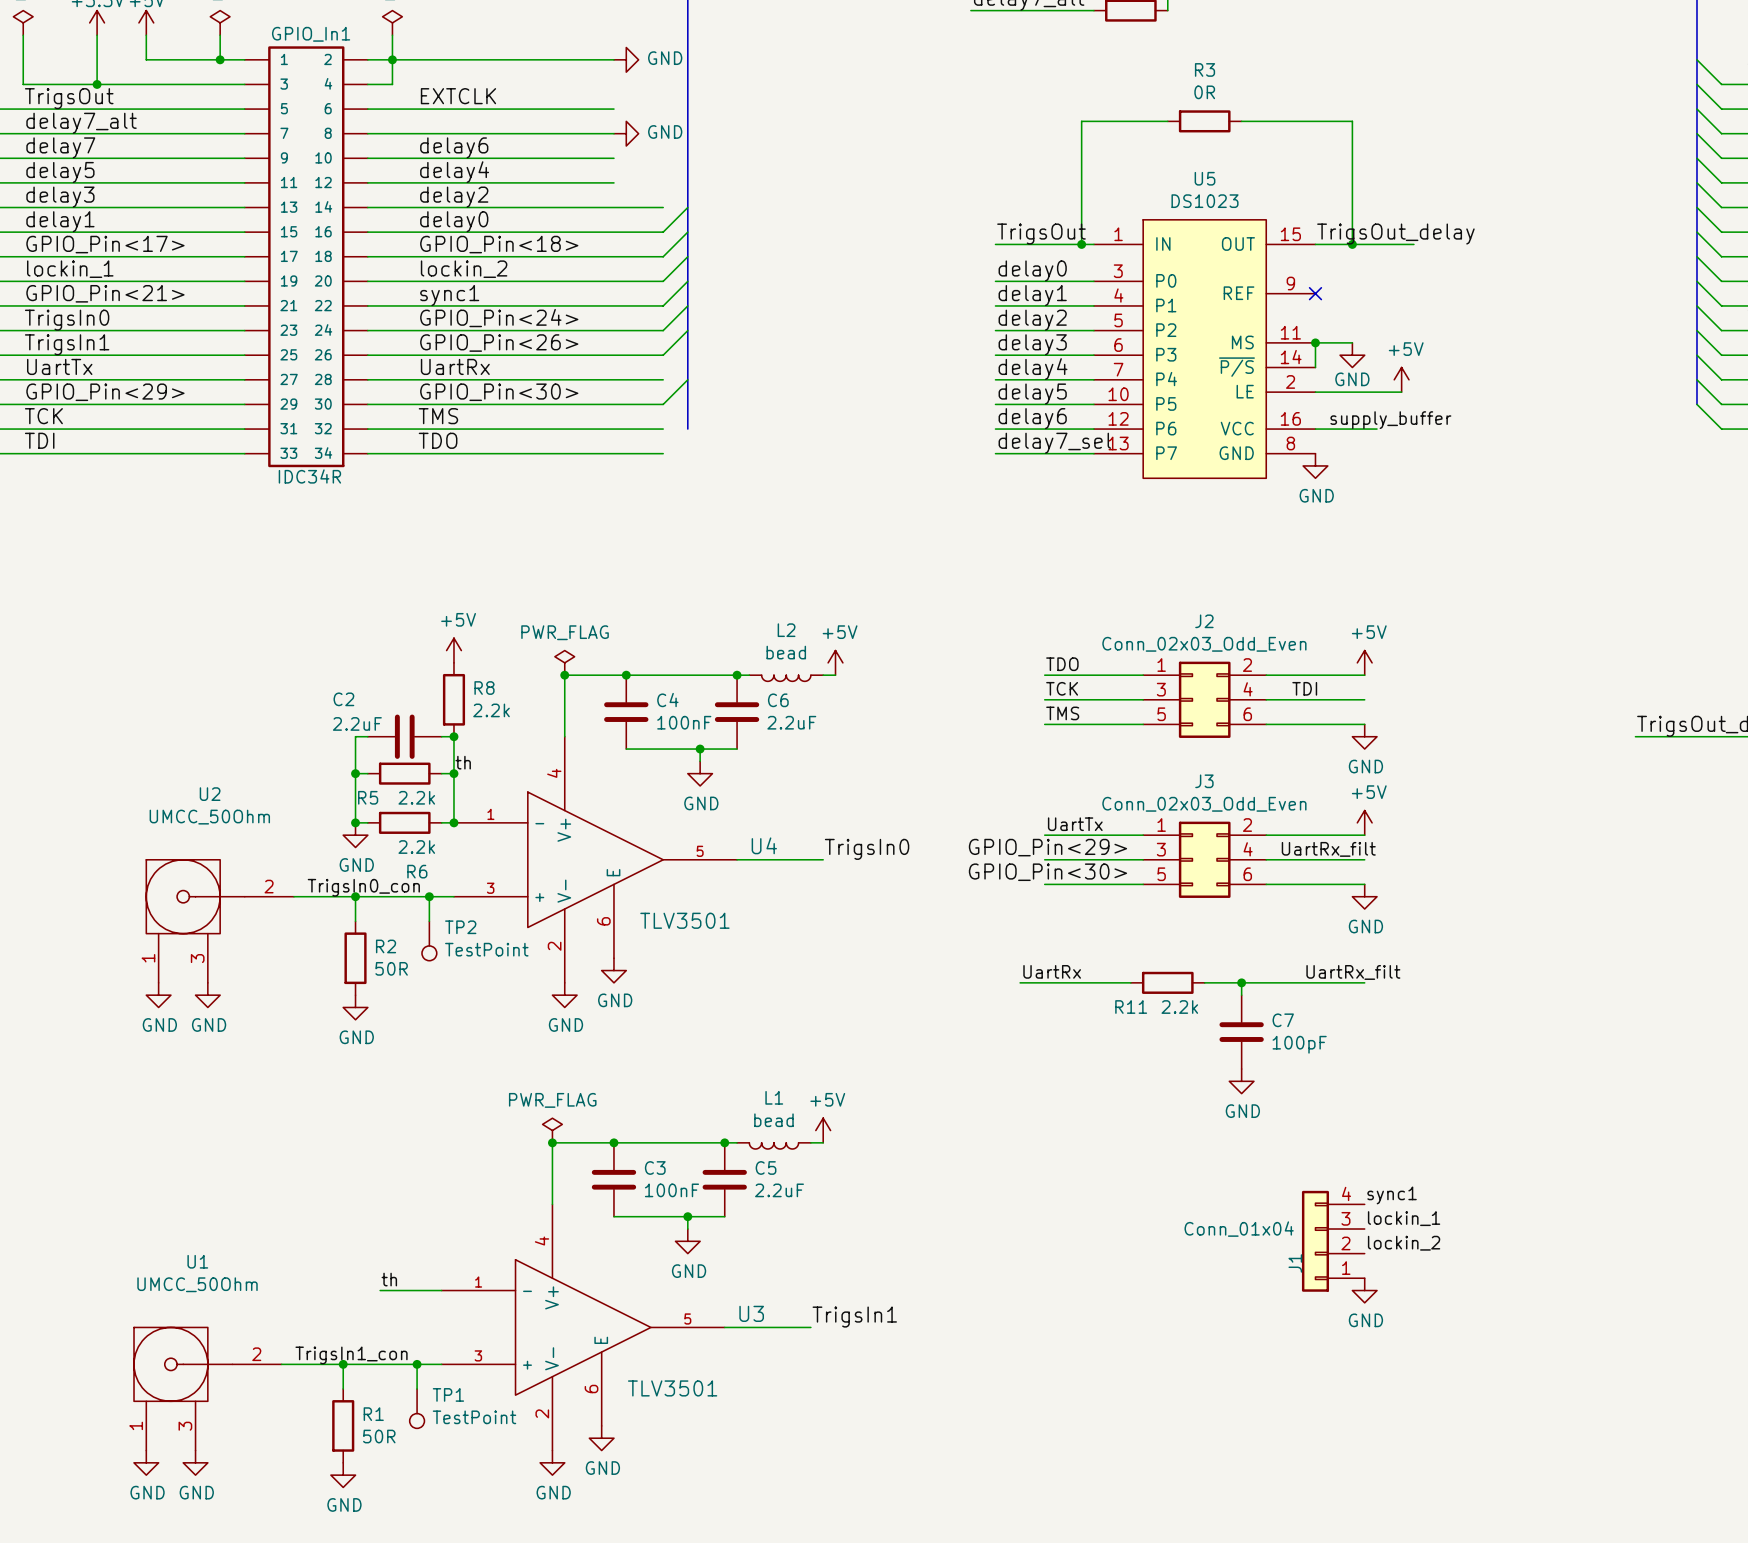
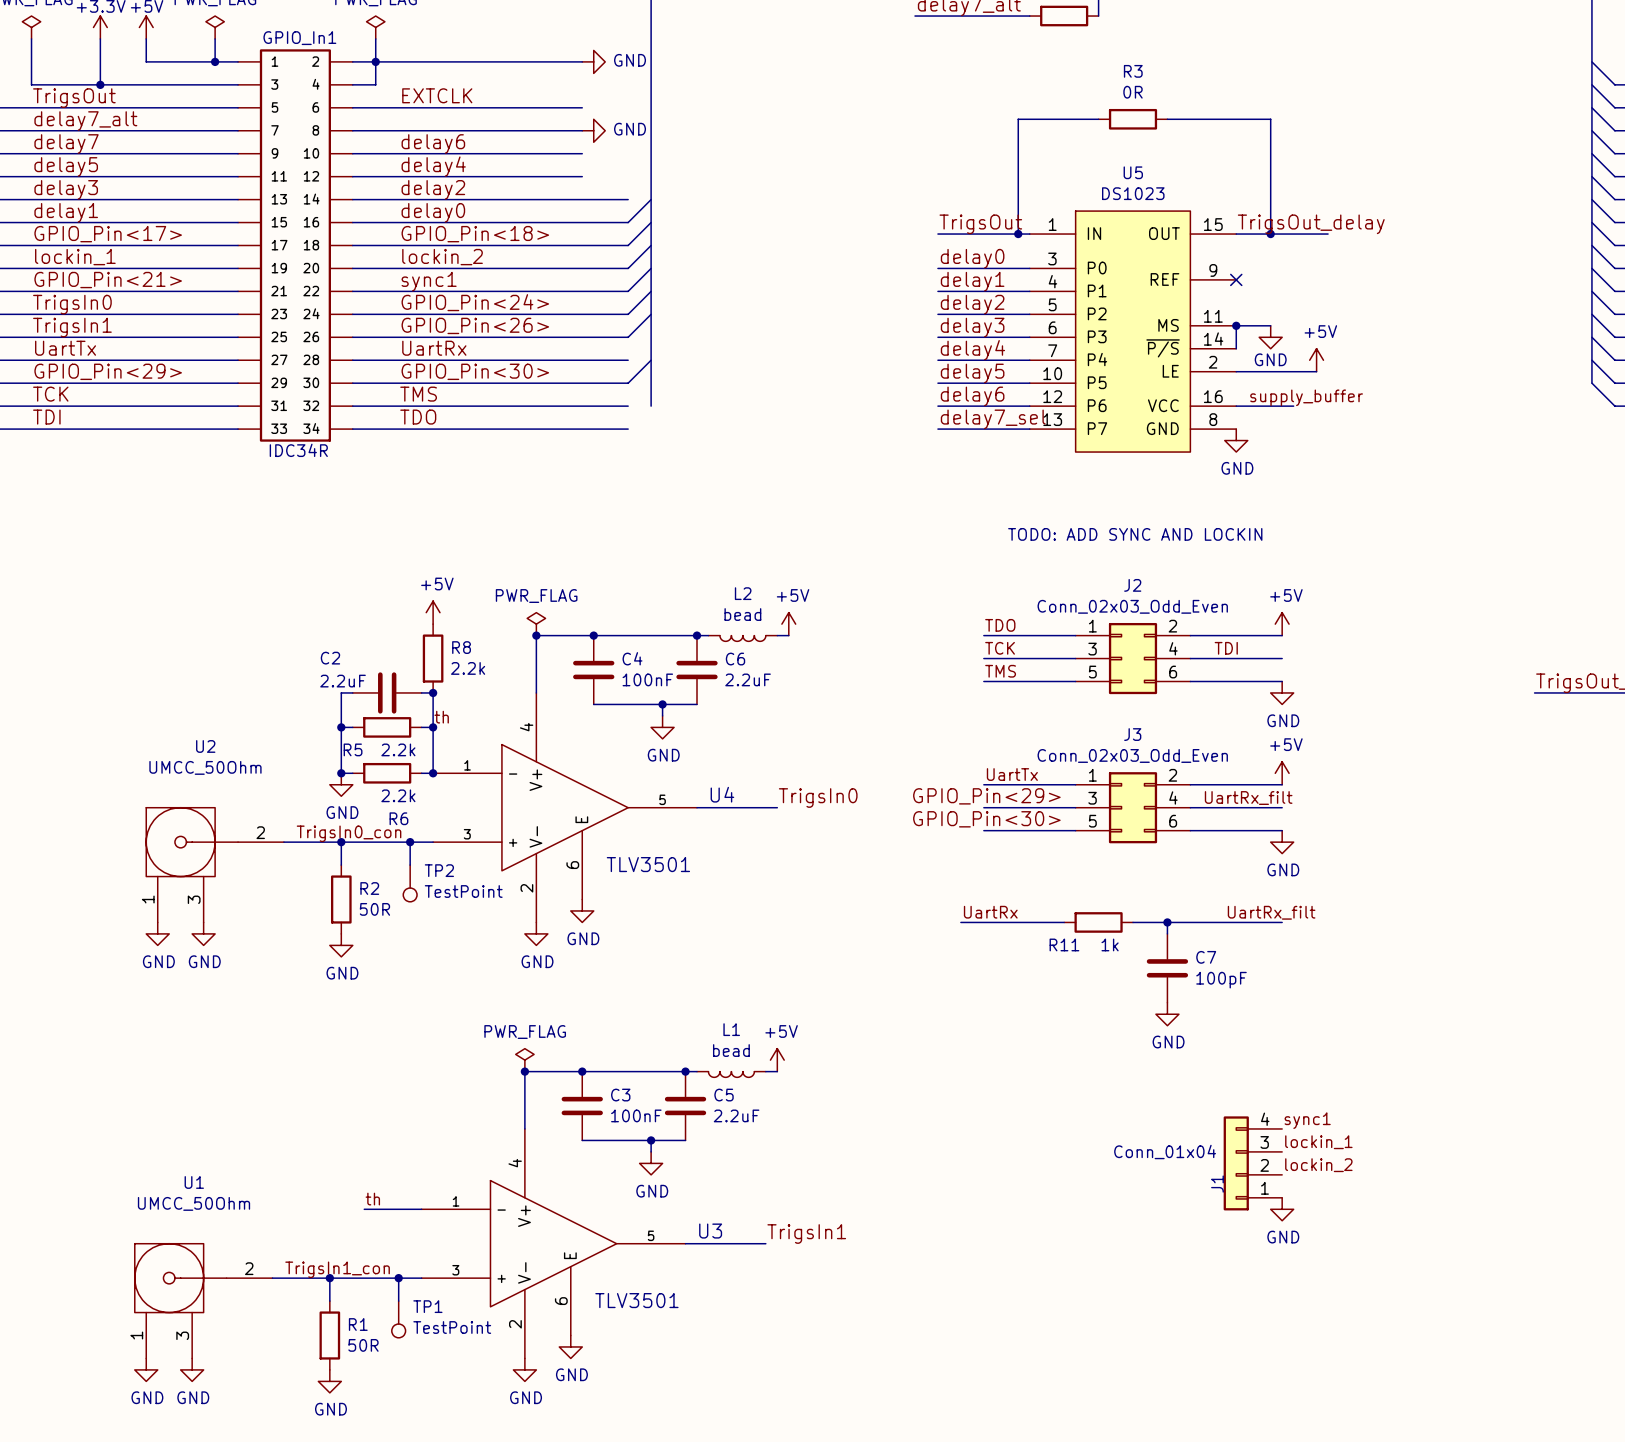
text: none -> TODO: ADD SYNC AND LOCKIN (1135, 534)
R11 value: 2.2k (1179, 1007) -> 1k (1110, 944)

